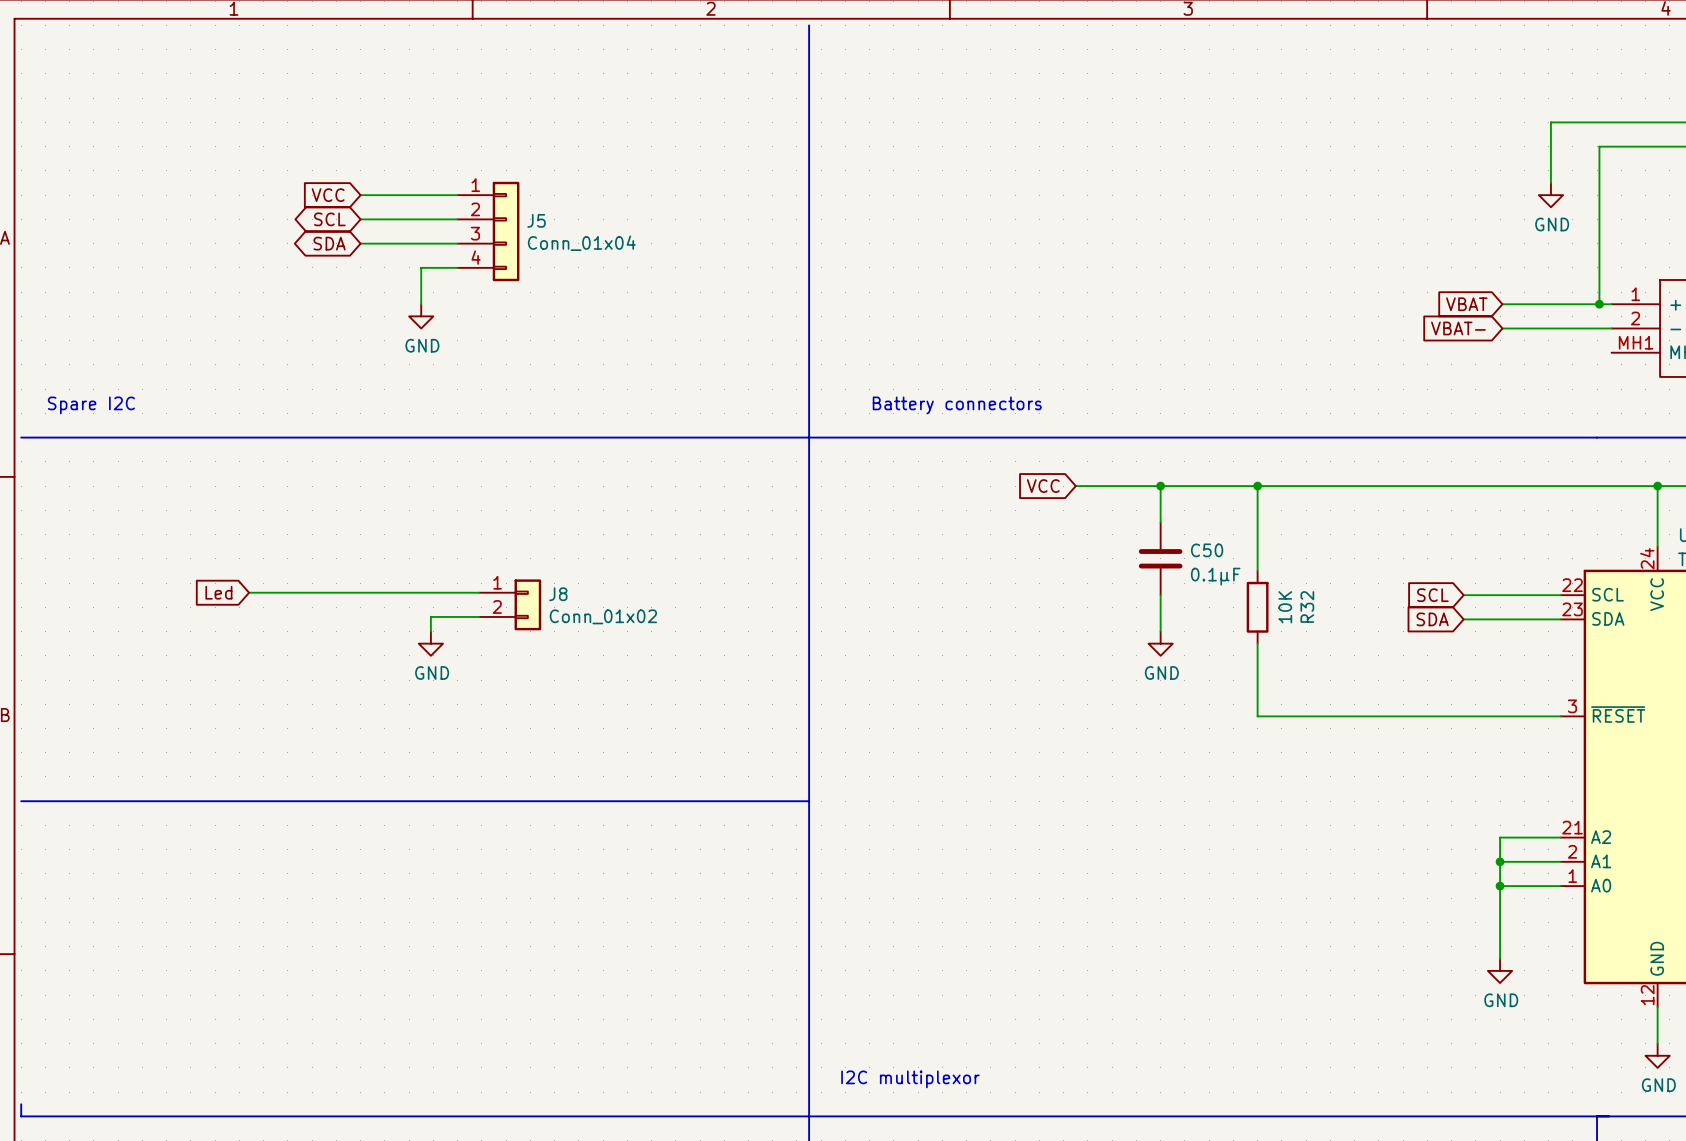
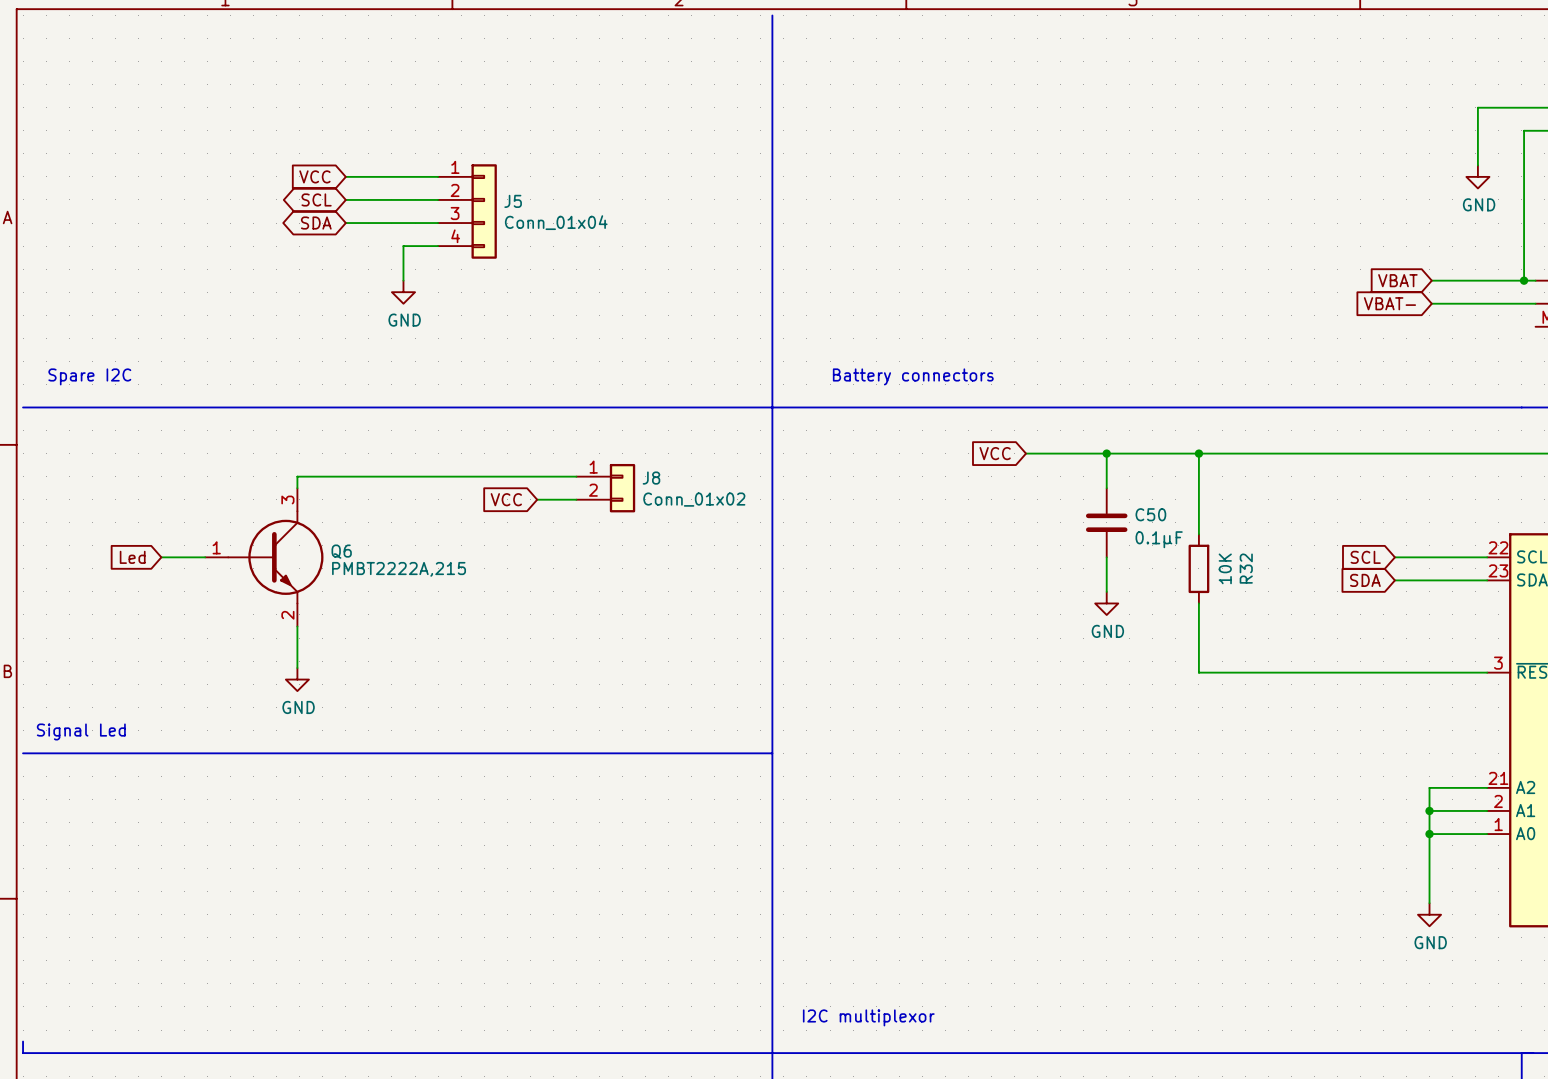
wire: none -> (576, 476) (297, 476) (297, 488)
global label: none -> VCC (506, 499)
wire: none -> (537, 499) (576, 499)
global label position: Led (218, 592) -> Led (132, 557)
wire: (249, 592) (479, 592) -> none
wire: none -> (161, 557) (205, 557)
Q6: none -> PMBT2222A,215 (264, 557)
J8 position: (510, 604) -> (605, 488)
wire: (479, 616) (430, 616) (430, 631) -> none
power symbol position: GND (430, 643) -> GND (297, 679)
wire: none -> (297, 626) (297, 668)
text: none -> Signal Led (81, 731)

